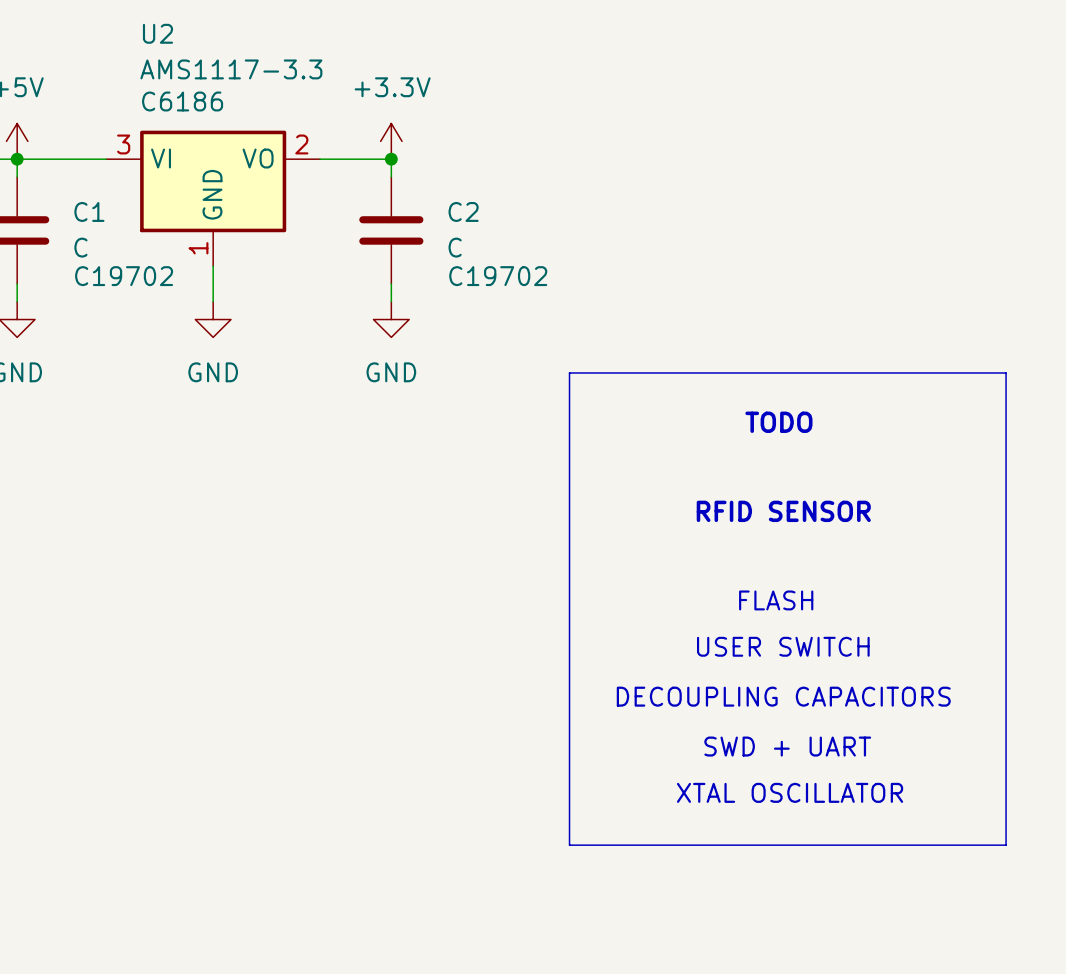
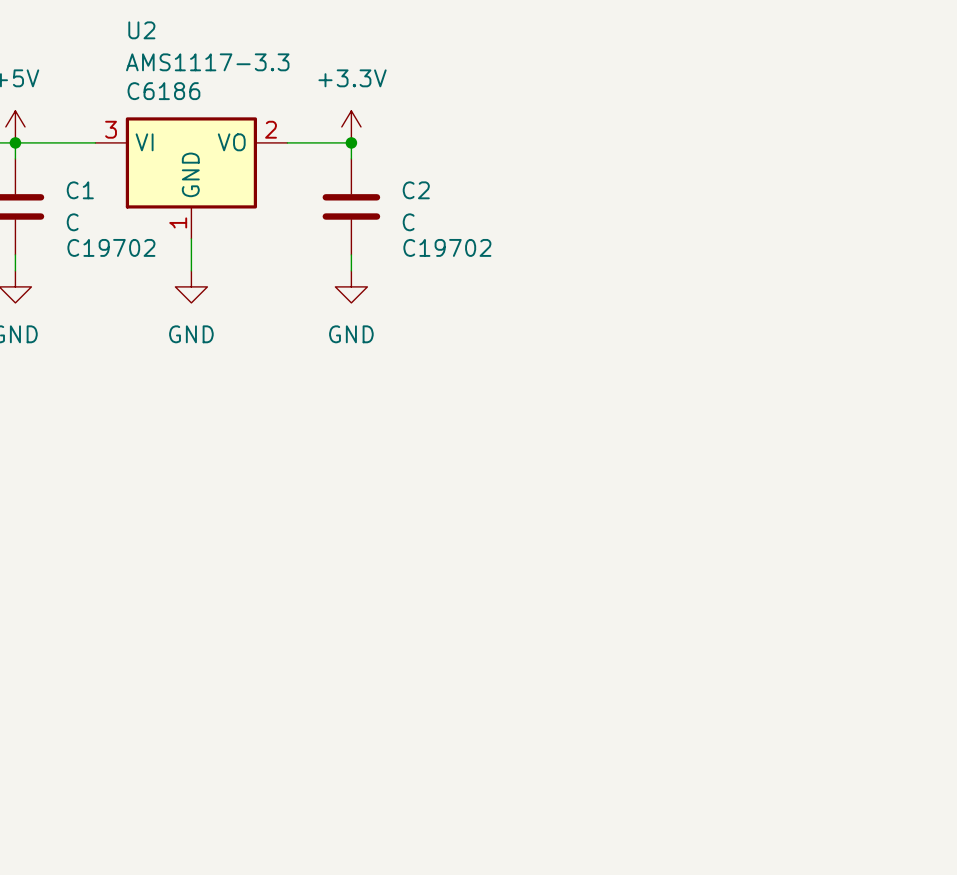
line: (569, 372) (1006, 372) (1006, 845) (569, 845) (569, 372) -> none
text: TODO (778, 422) -> none
text: RFID SENSOR (783, 511) -> none
text: FLASH (776, 600) -> none
text: USER SWITCH (783, 646) -> none
text: DECOUPLING CAPACITORS (783, 696) -> none
text: SWD + UART (787, 746) -> none
text: XTAL OSCILLATOR (790, 792) -> none

